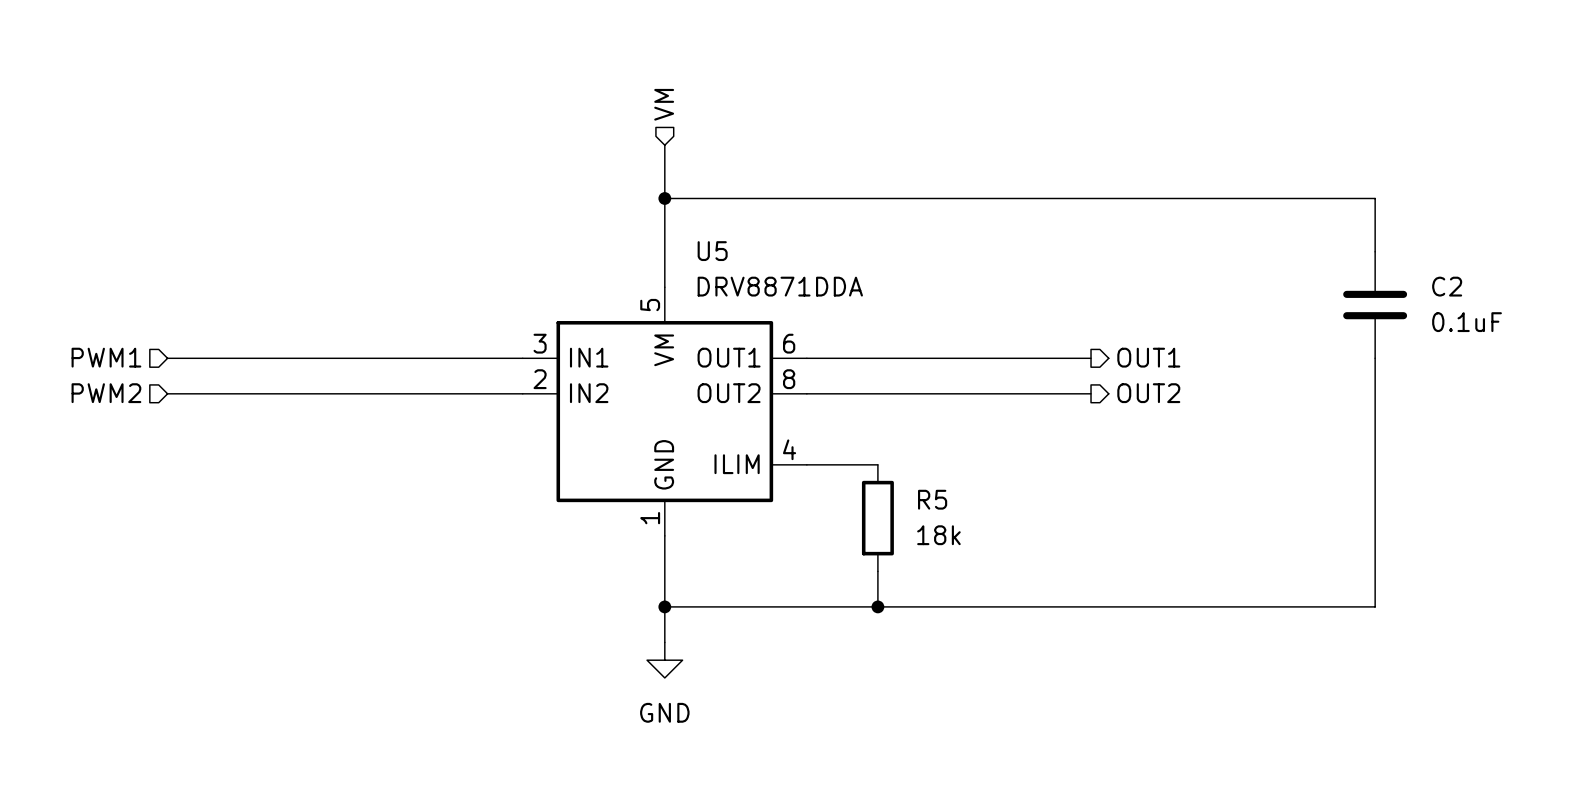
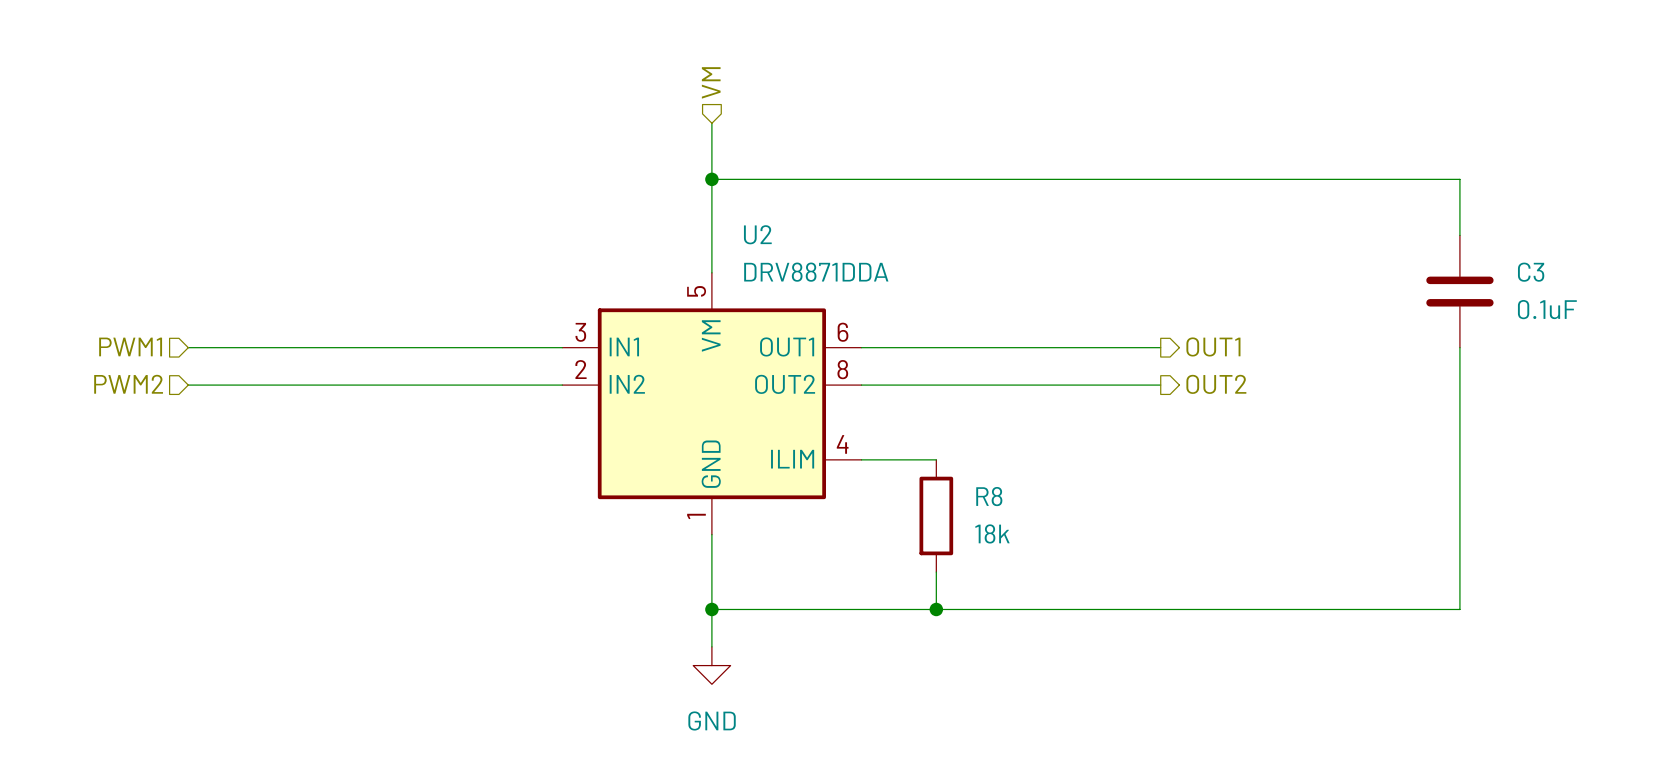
U5 name: U5 (712, 251) -> U2 (757, 234)
C2 name: C2 (1447, 286) -> C3 (1531, 272)
R5 name: R5 (932, 499) -> R8 (989, 496)

